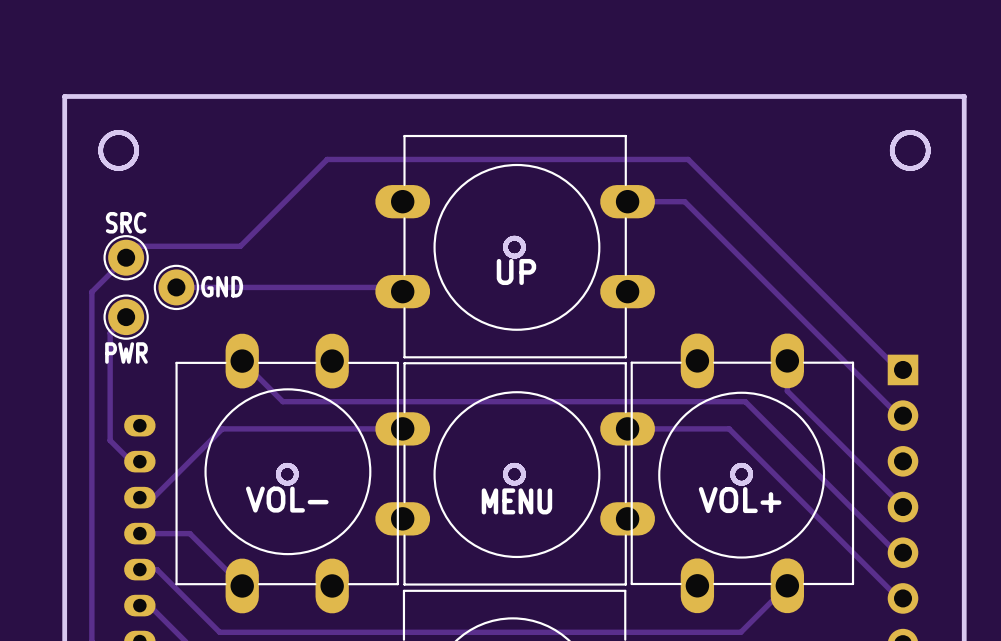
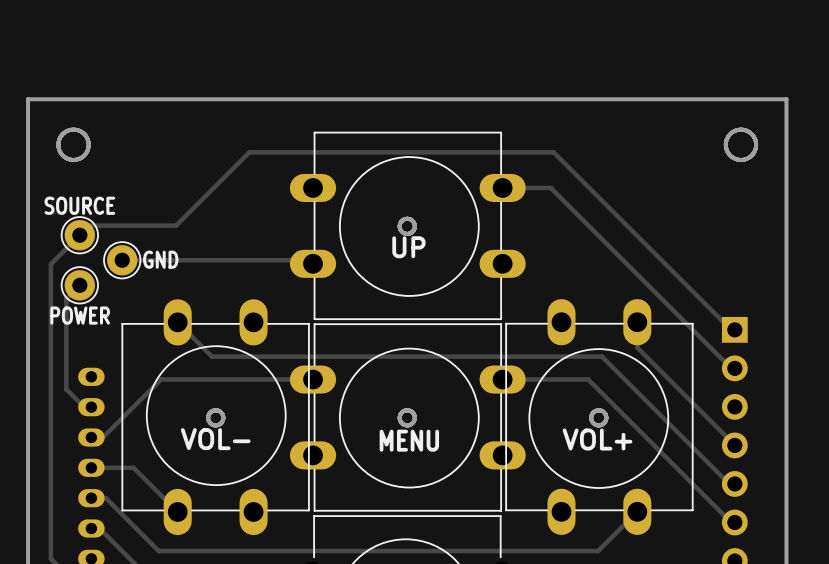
text: SRC (126, 222) -> SOURCE (79, 205)
text: PWR (126, 353) -> POWER (80, 315)

